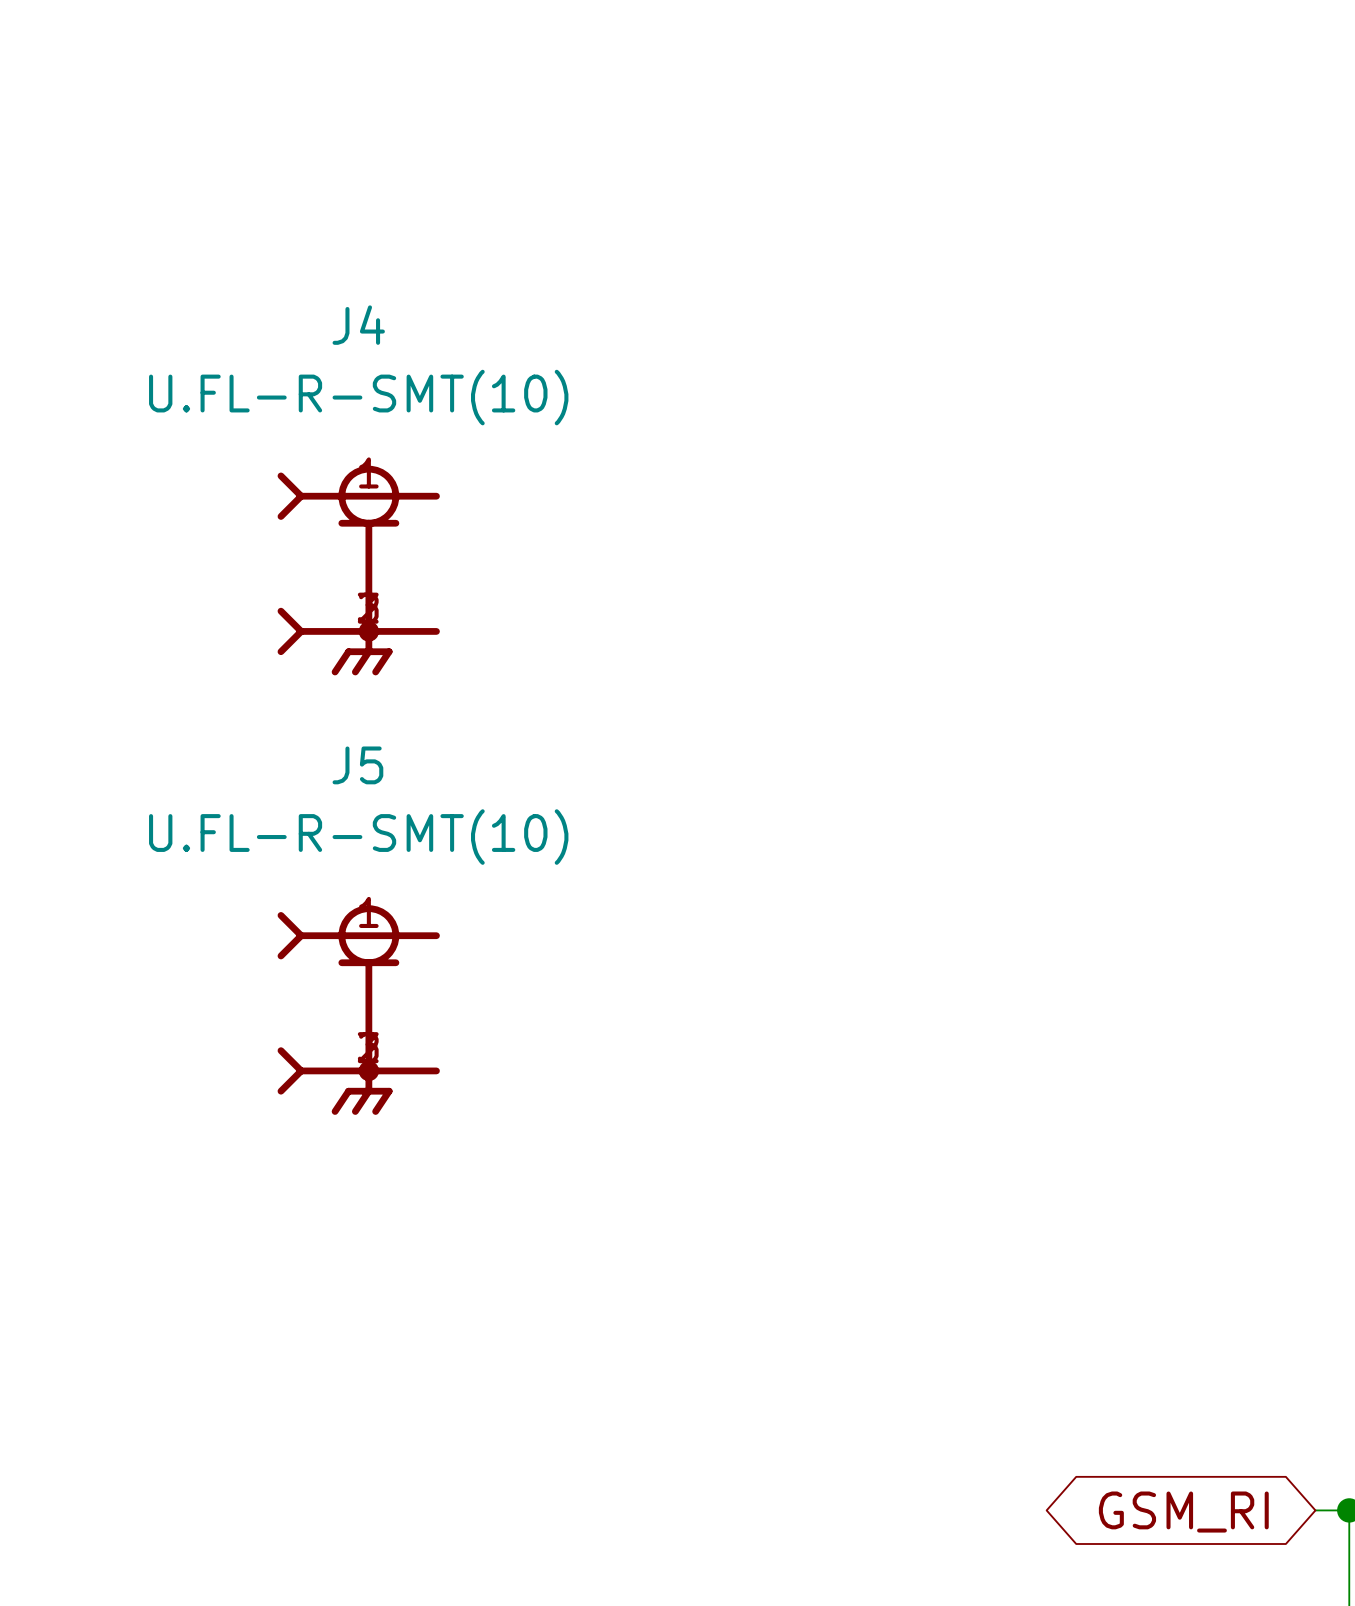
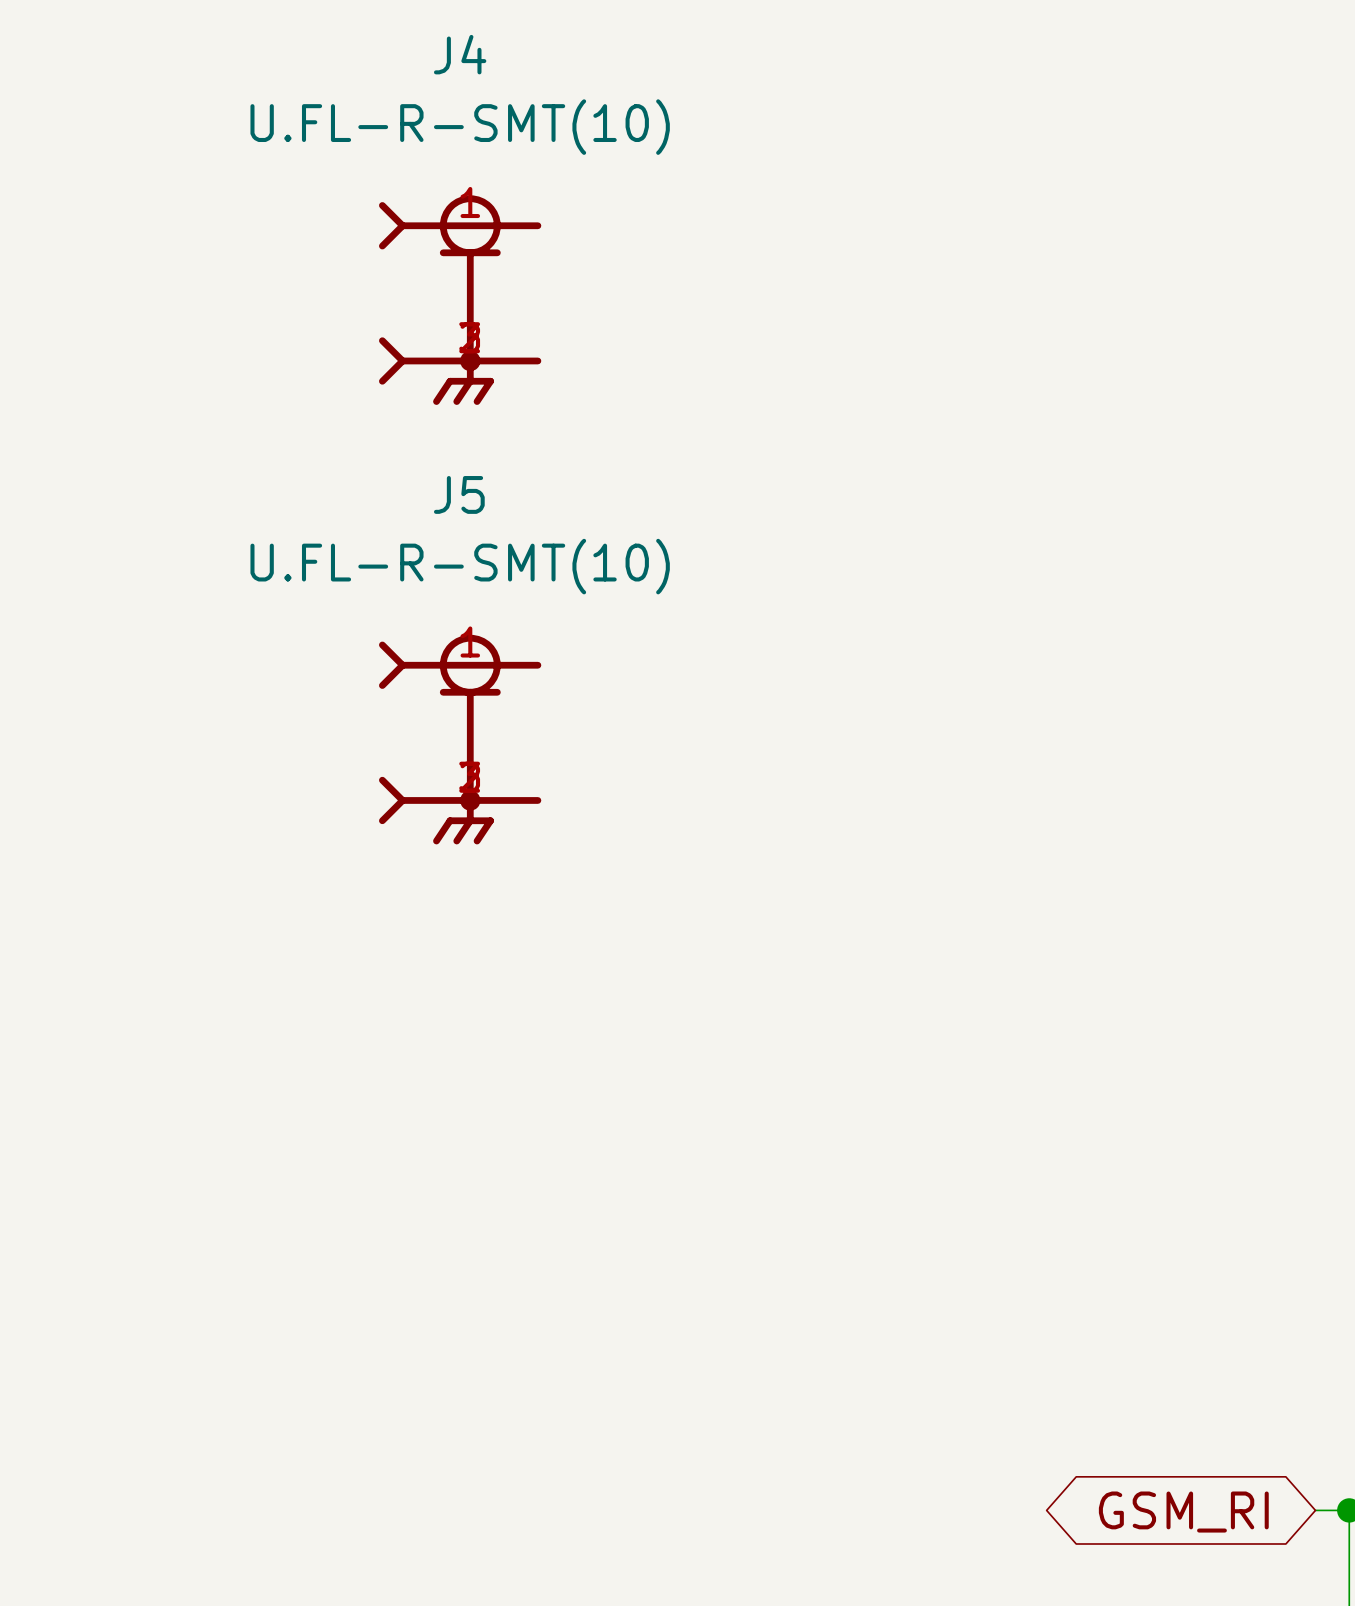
J4 position: (358, 570) -> (460, 300)
J5 position: (358, 1010) -> (460, 739)

